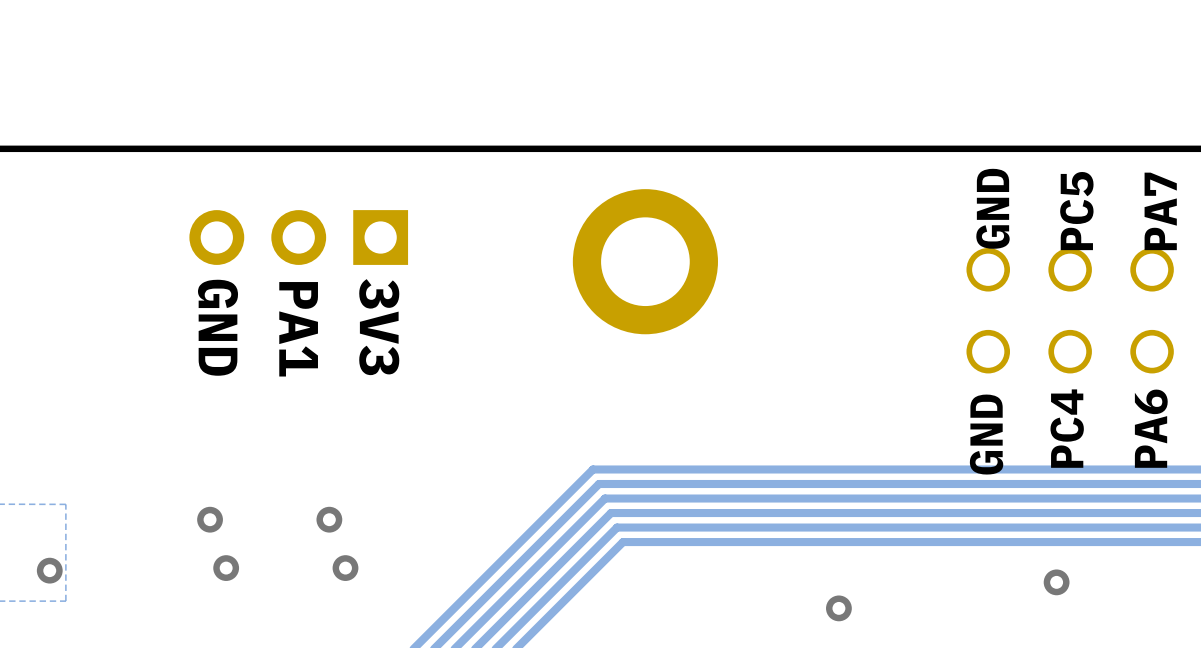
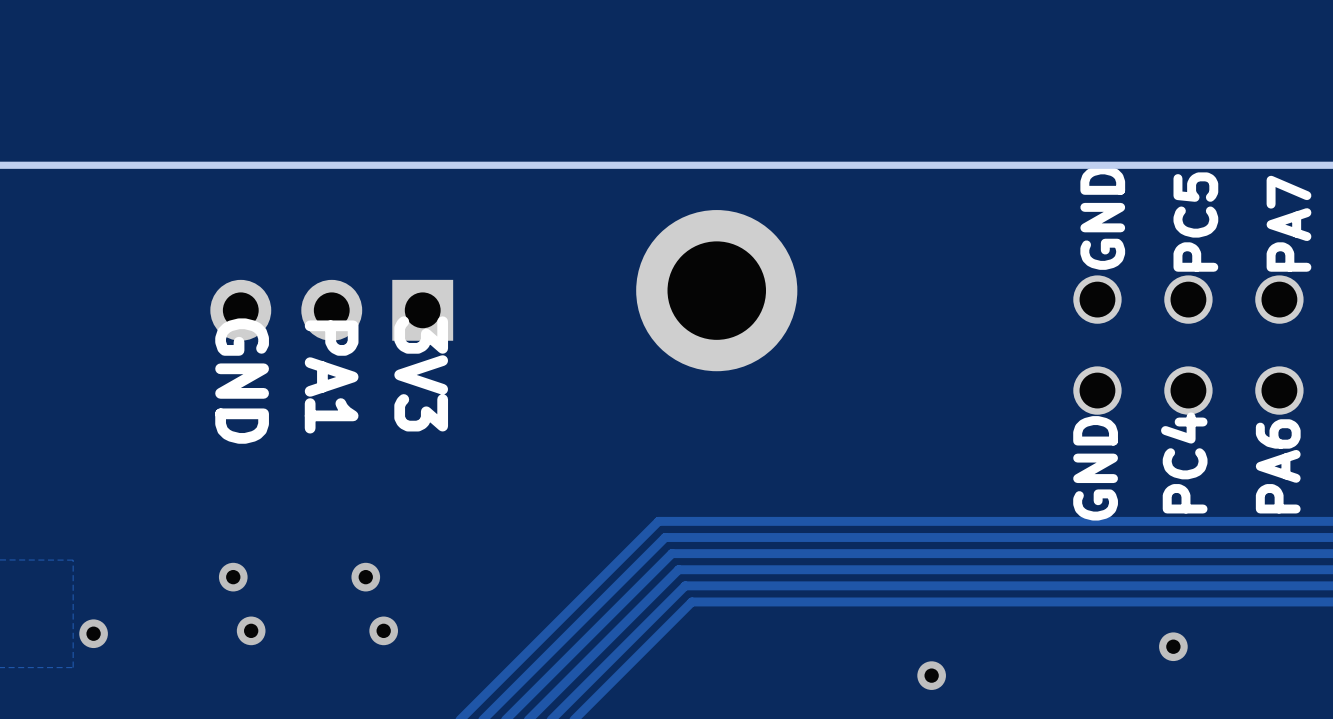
part position: (298, 237) -> (331, 310)
via position: (49, 570) -> (93, 633)

